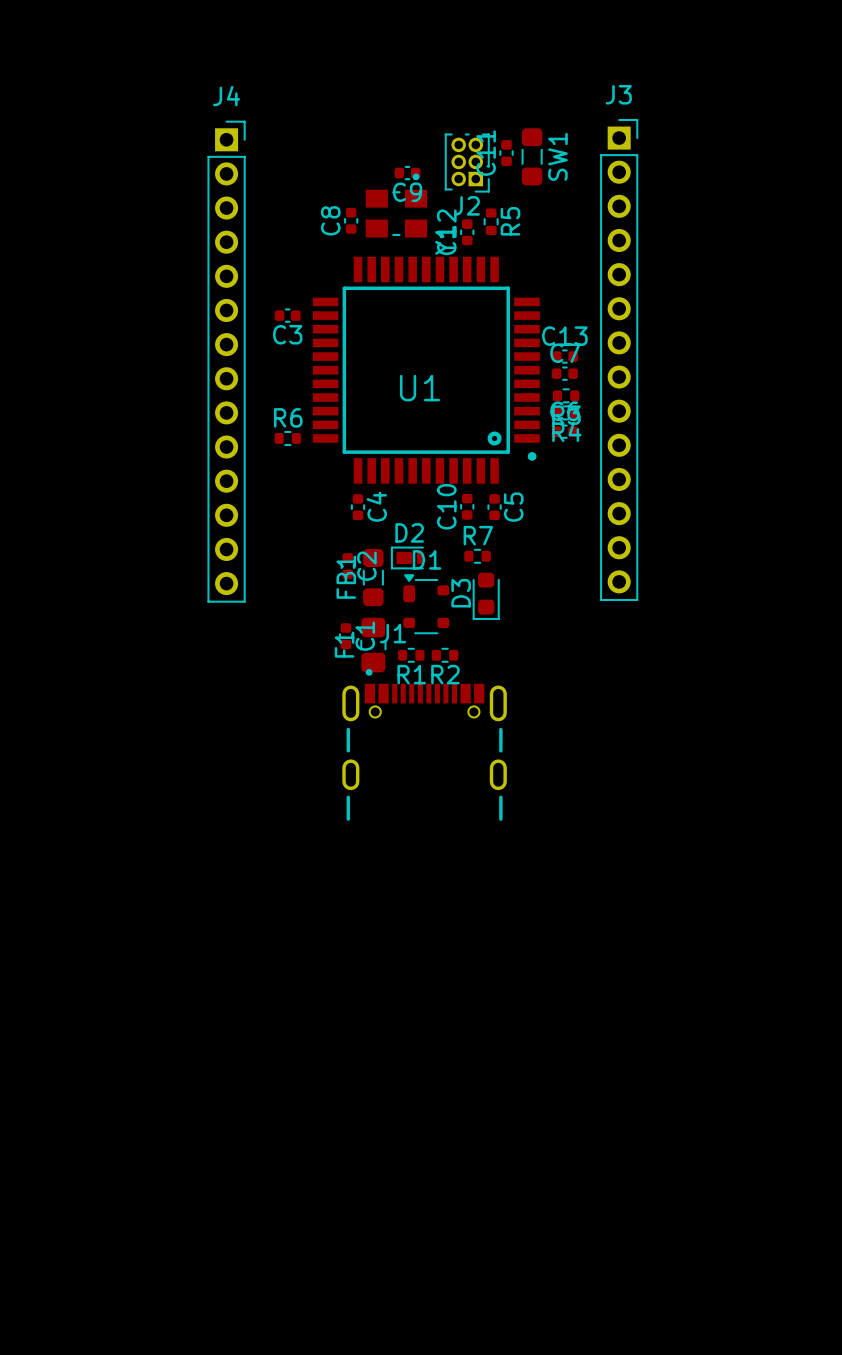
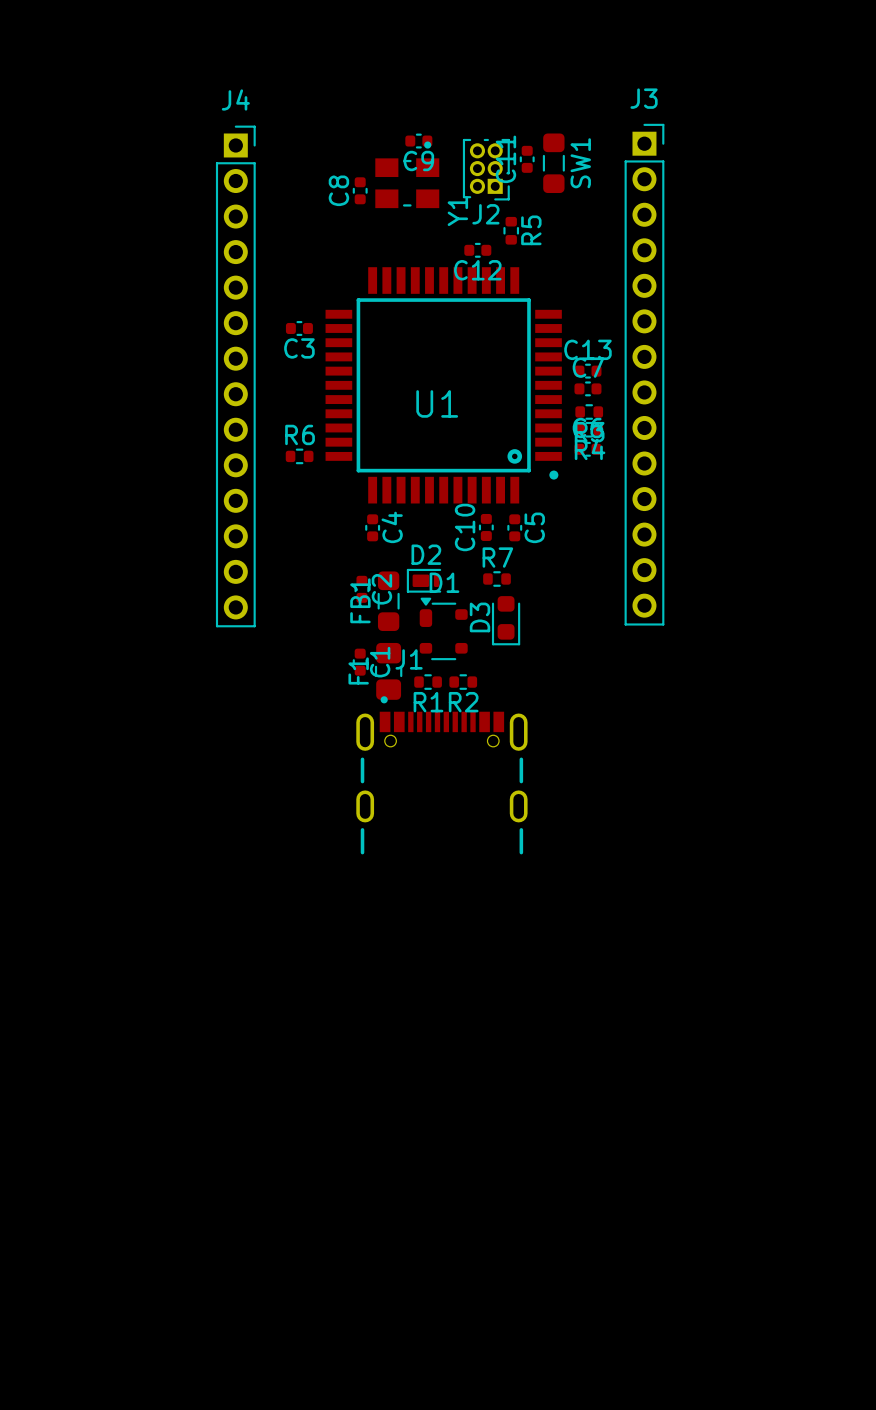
C9 position: (407, 173) -> (418, 141)
Y1 position: (396, 205) -> (407, 174)
C8 position: (351, 220) -> (360, 190)
C12 rotation: 0° (467, 232) -> 90° clockwise (477, 250)

